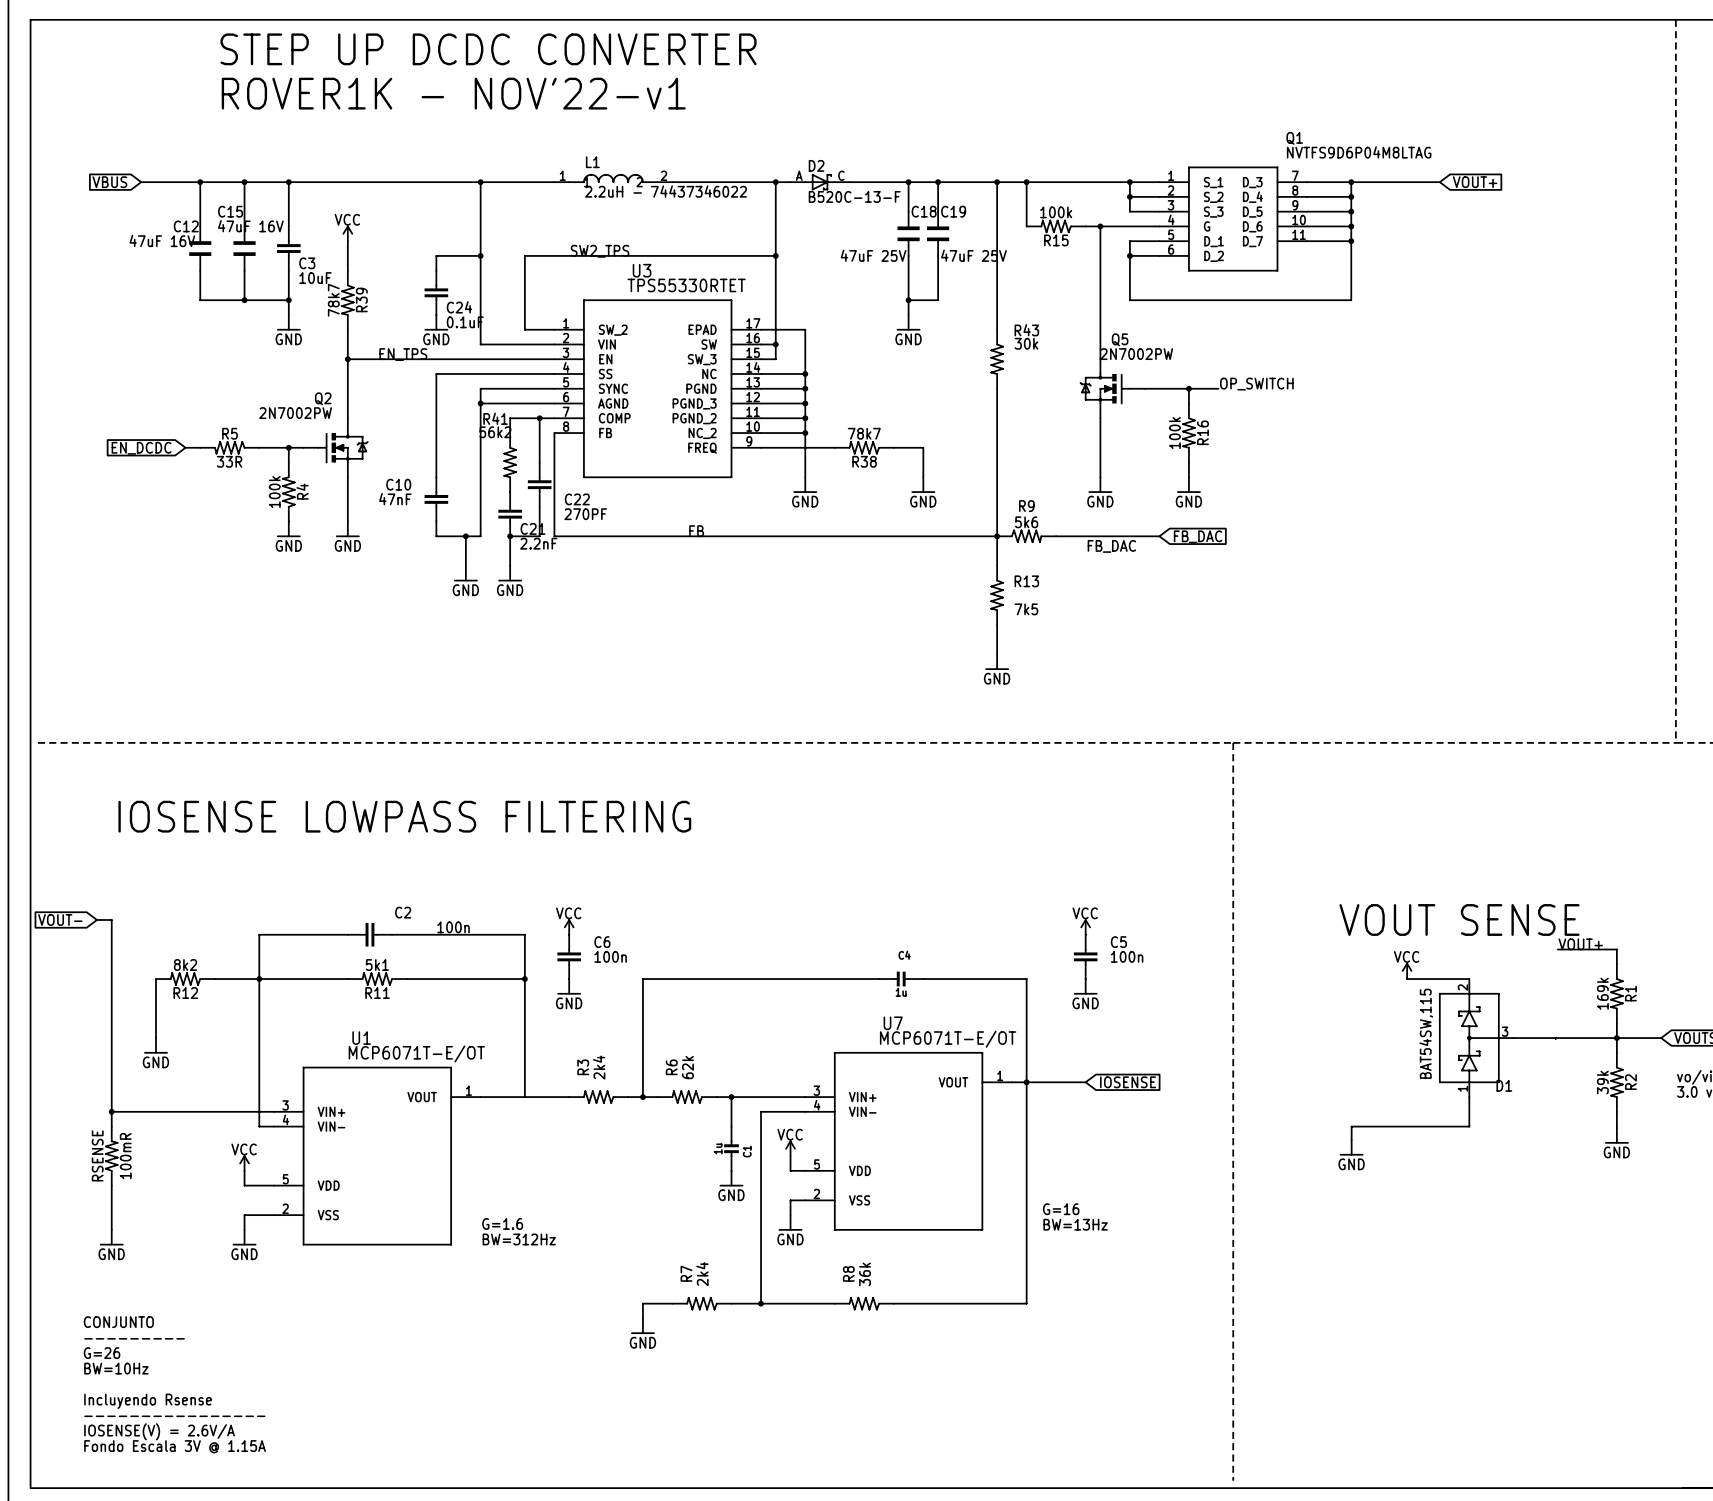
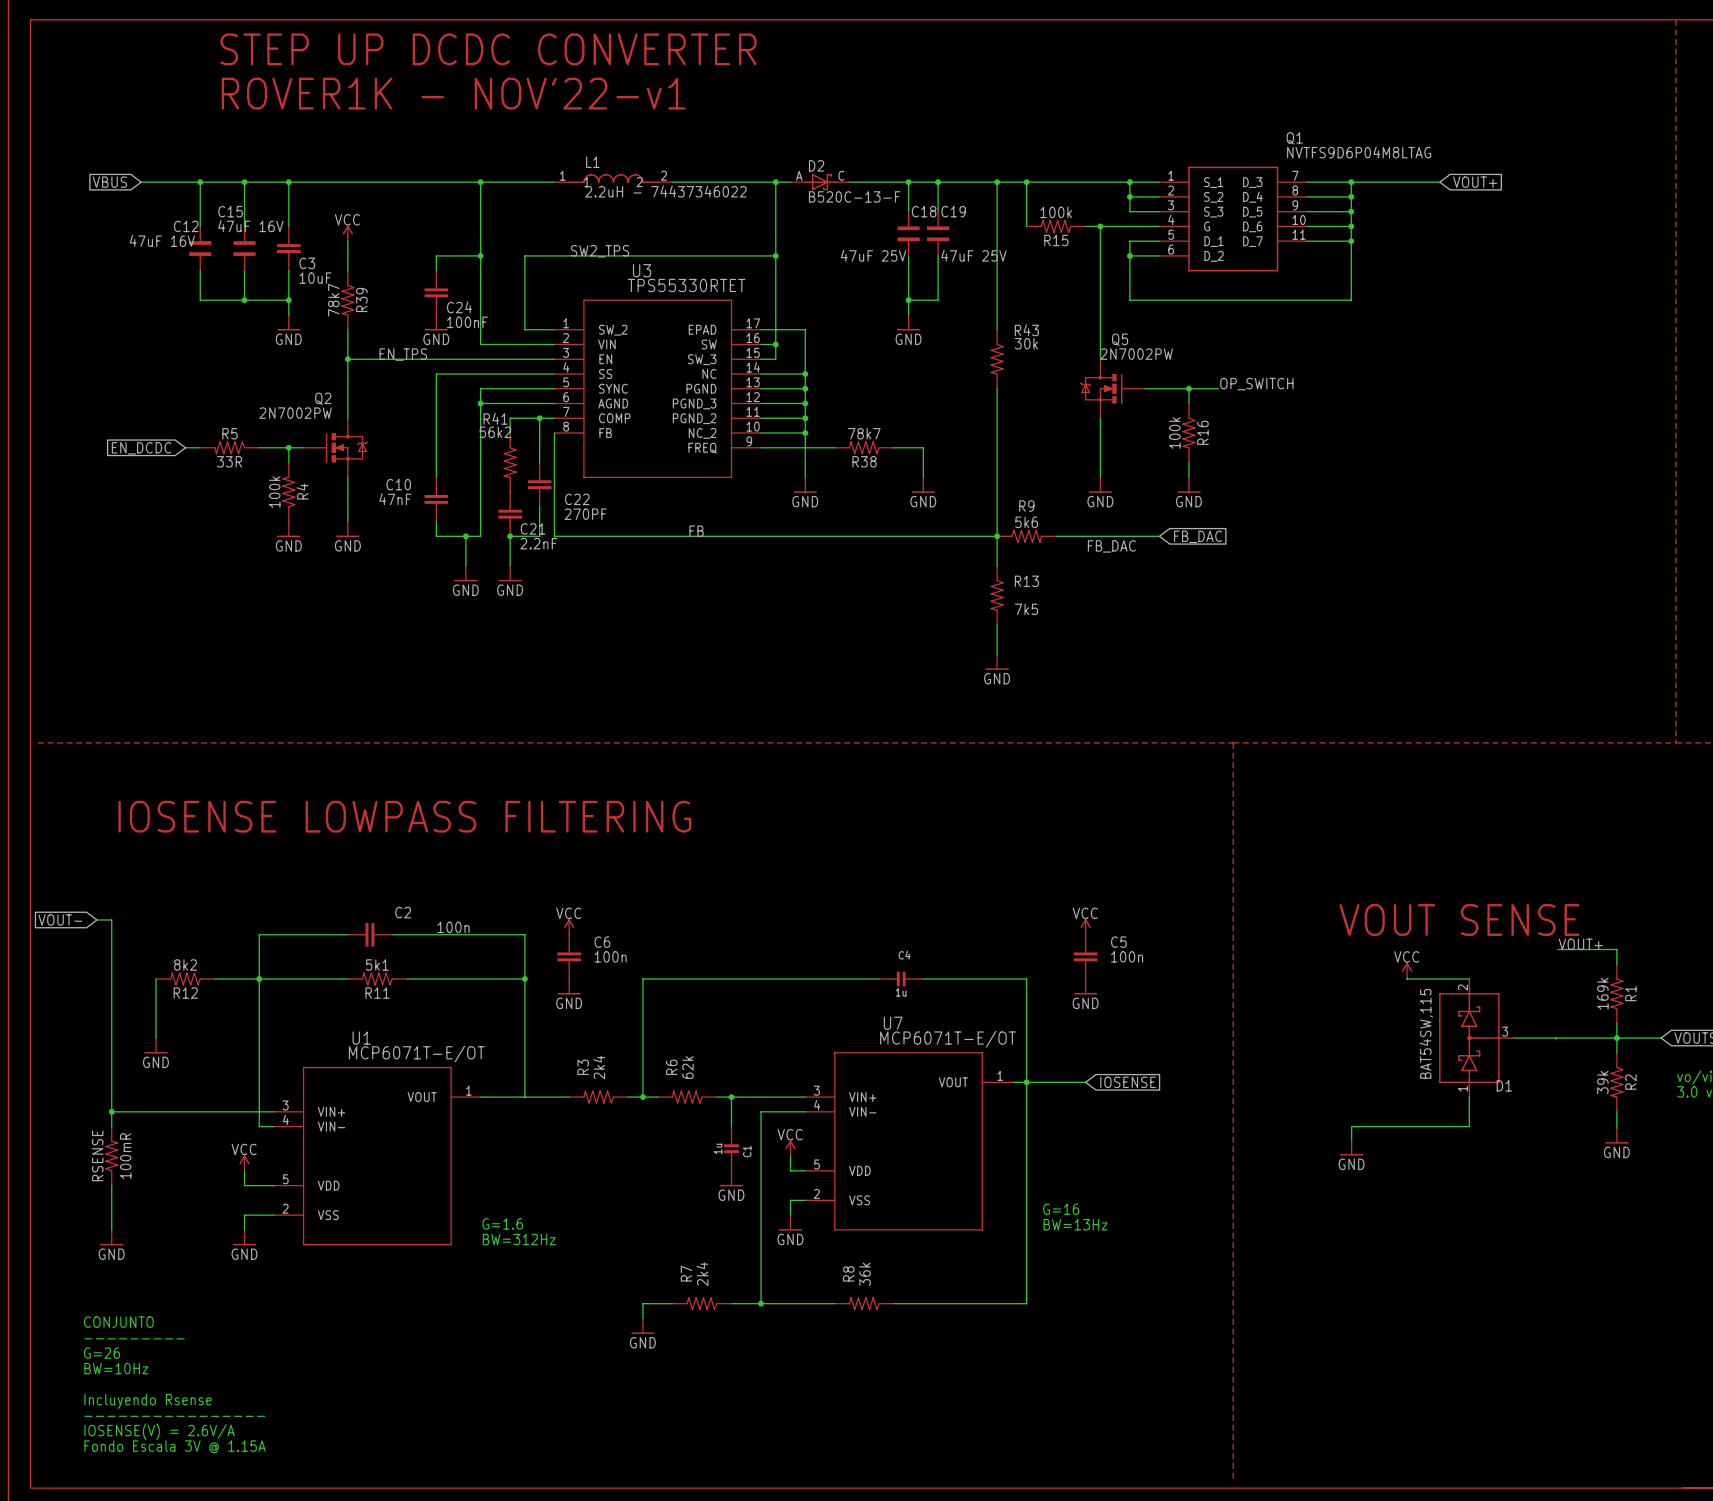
C24 value: 0.1uF (465, 322) -> 100nF (467, 322)

